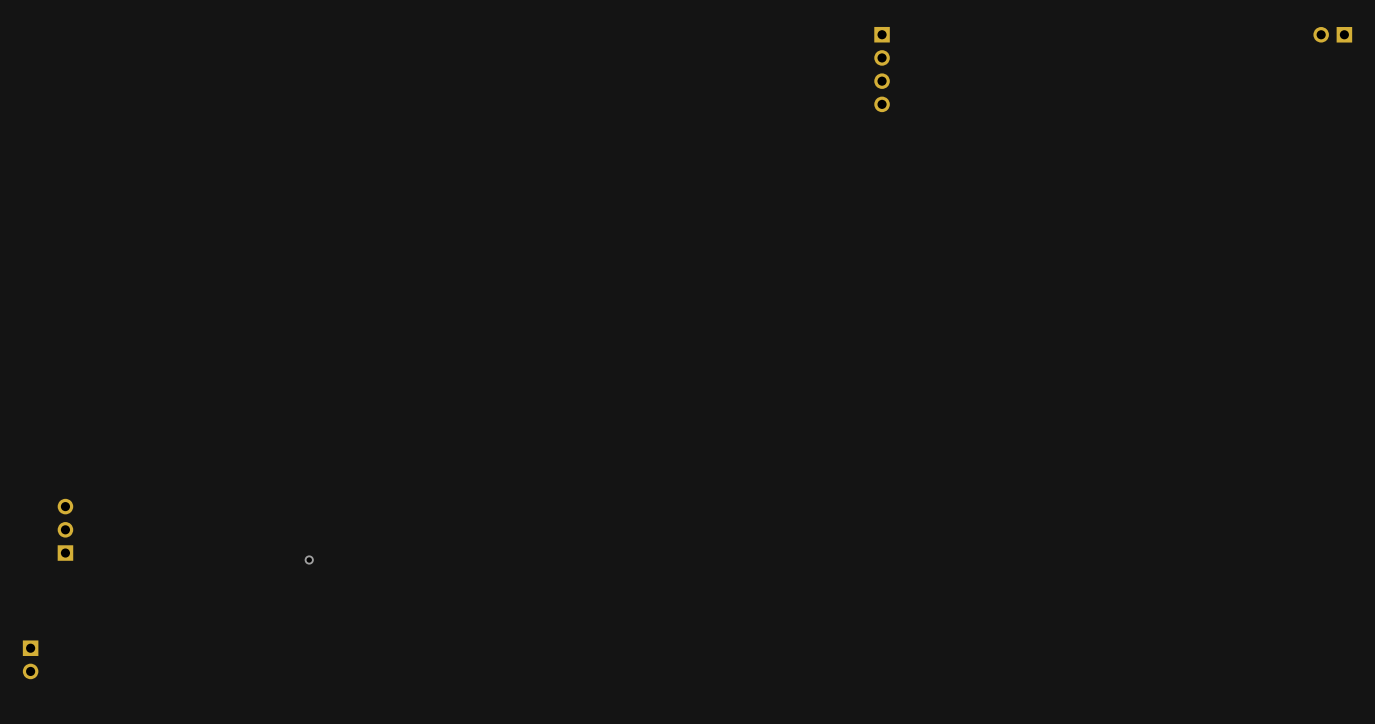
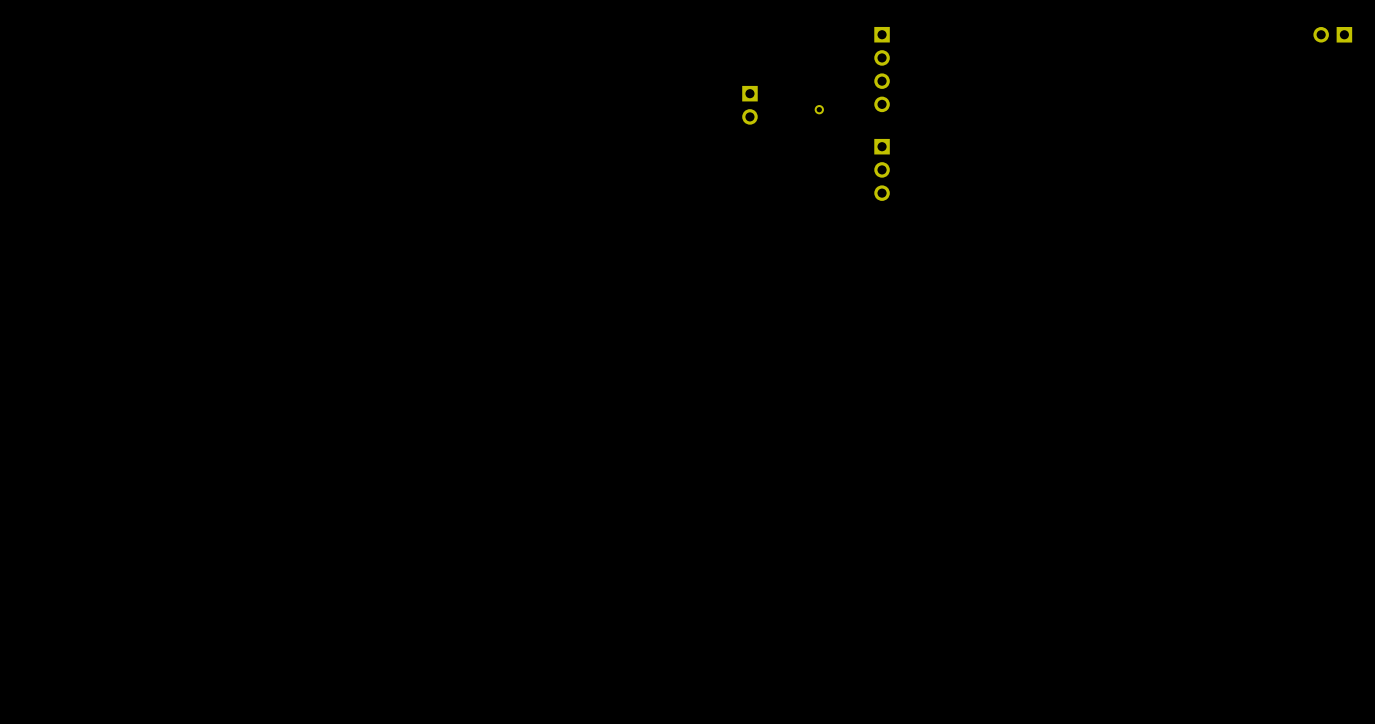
part: none -> (749, 105)
part: none -> (819, 109)
part: none -> (882, 169)
part: (65, 529) -> none
part: (309, 559) -> none
part: (30, 659) -> none

